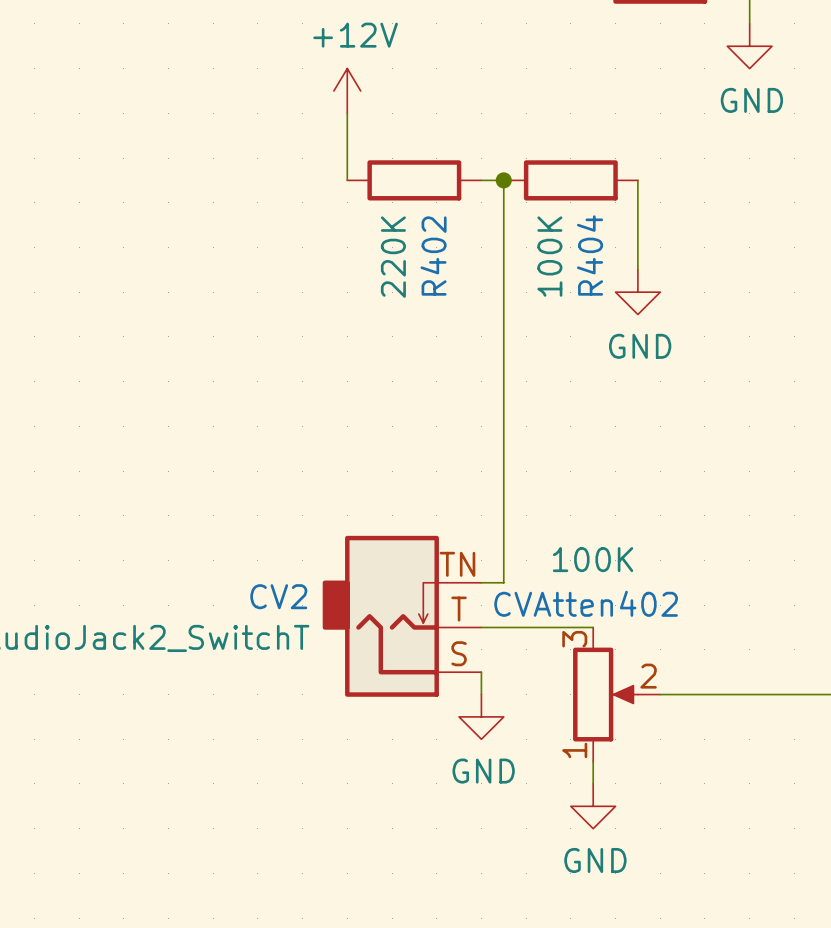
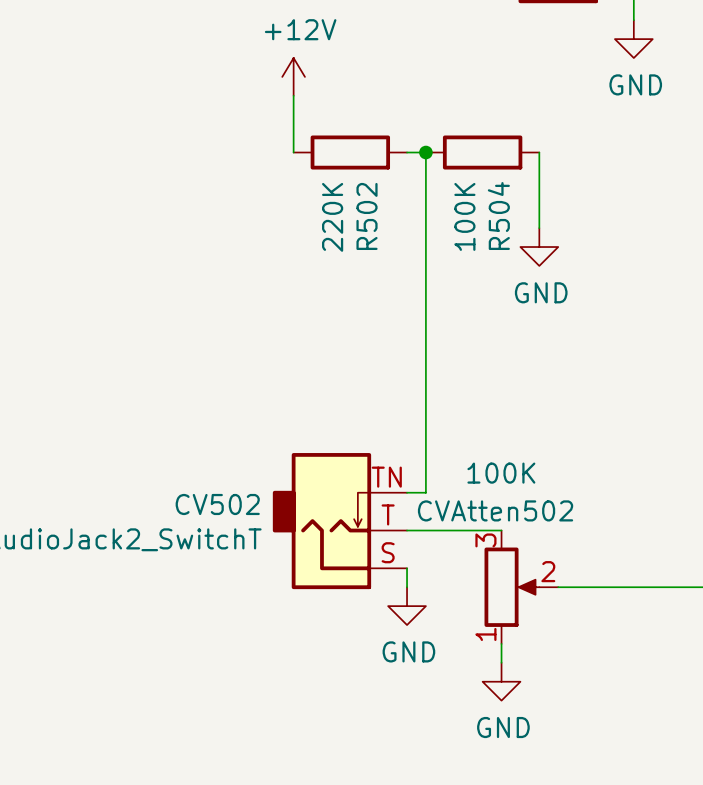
R404 name: R404 (590, 255) -> R504 (498, 216)
R402 name: R402 (433, 256) -> R502 (367, 216)
CV2 name: CV2 (278, 596) -> CV502 (217, 504)
CVAtten402 name: CVAtten402 (586, 603) -> CVAtten502 (495, 510)

